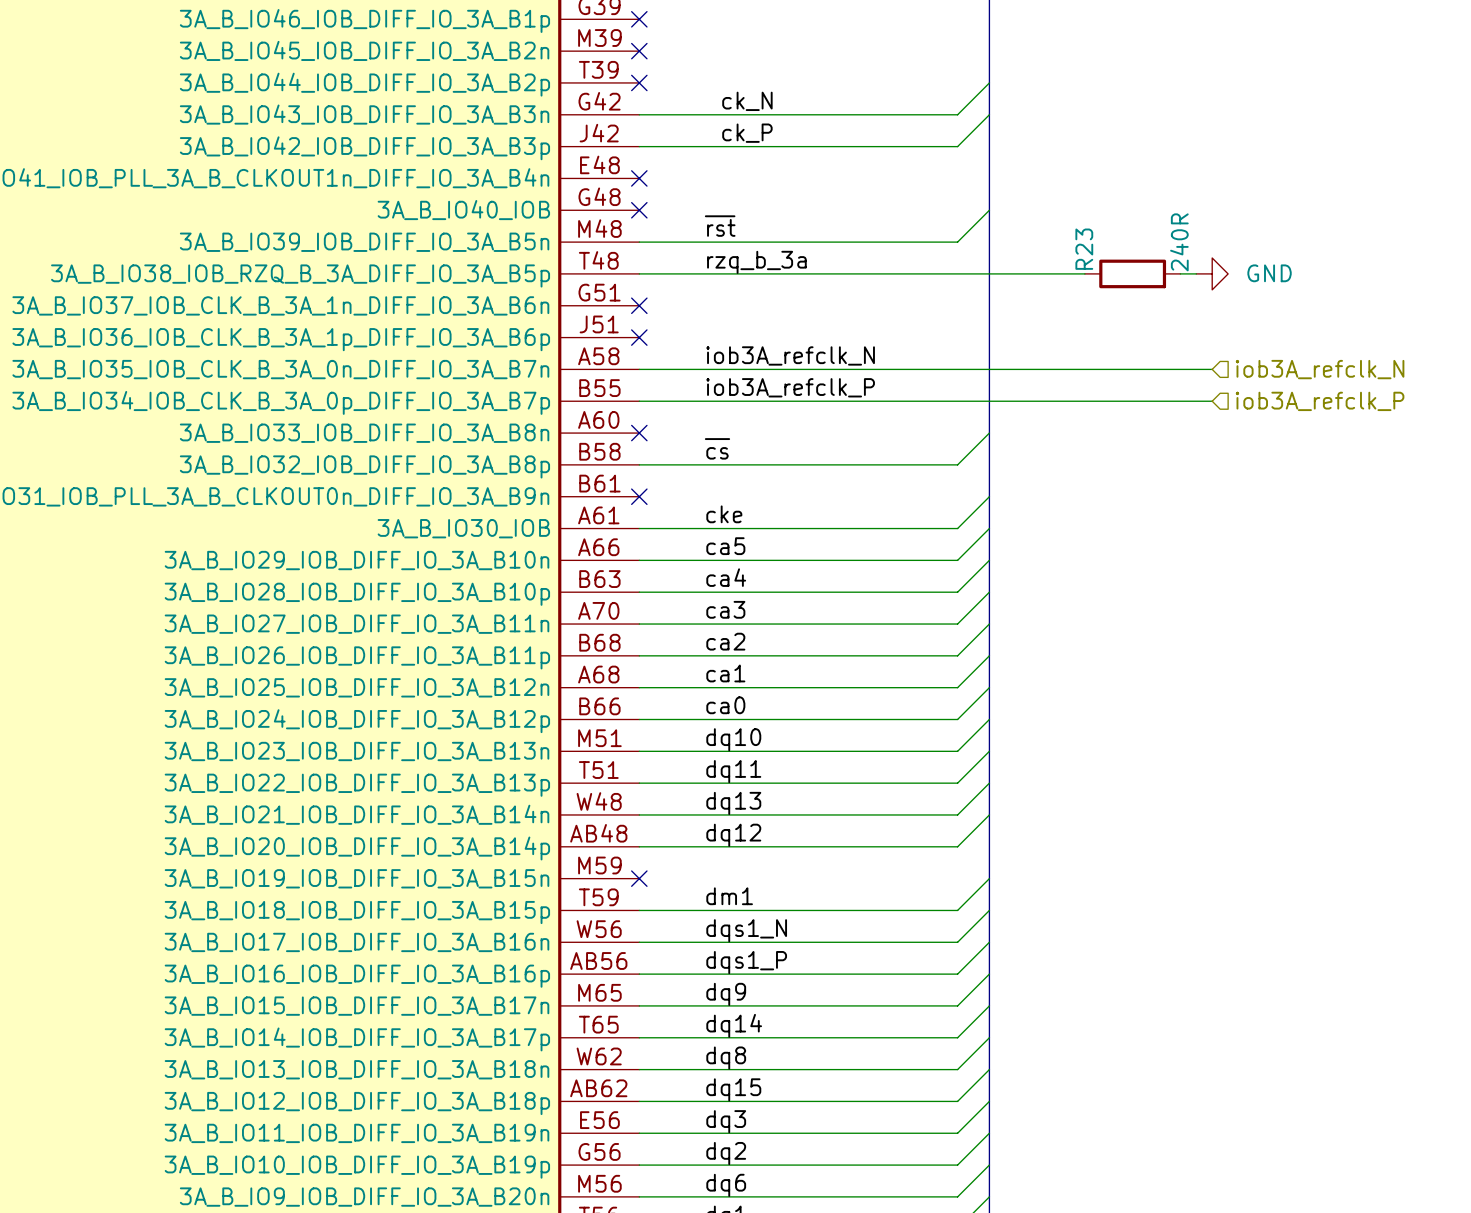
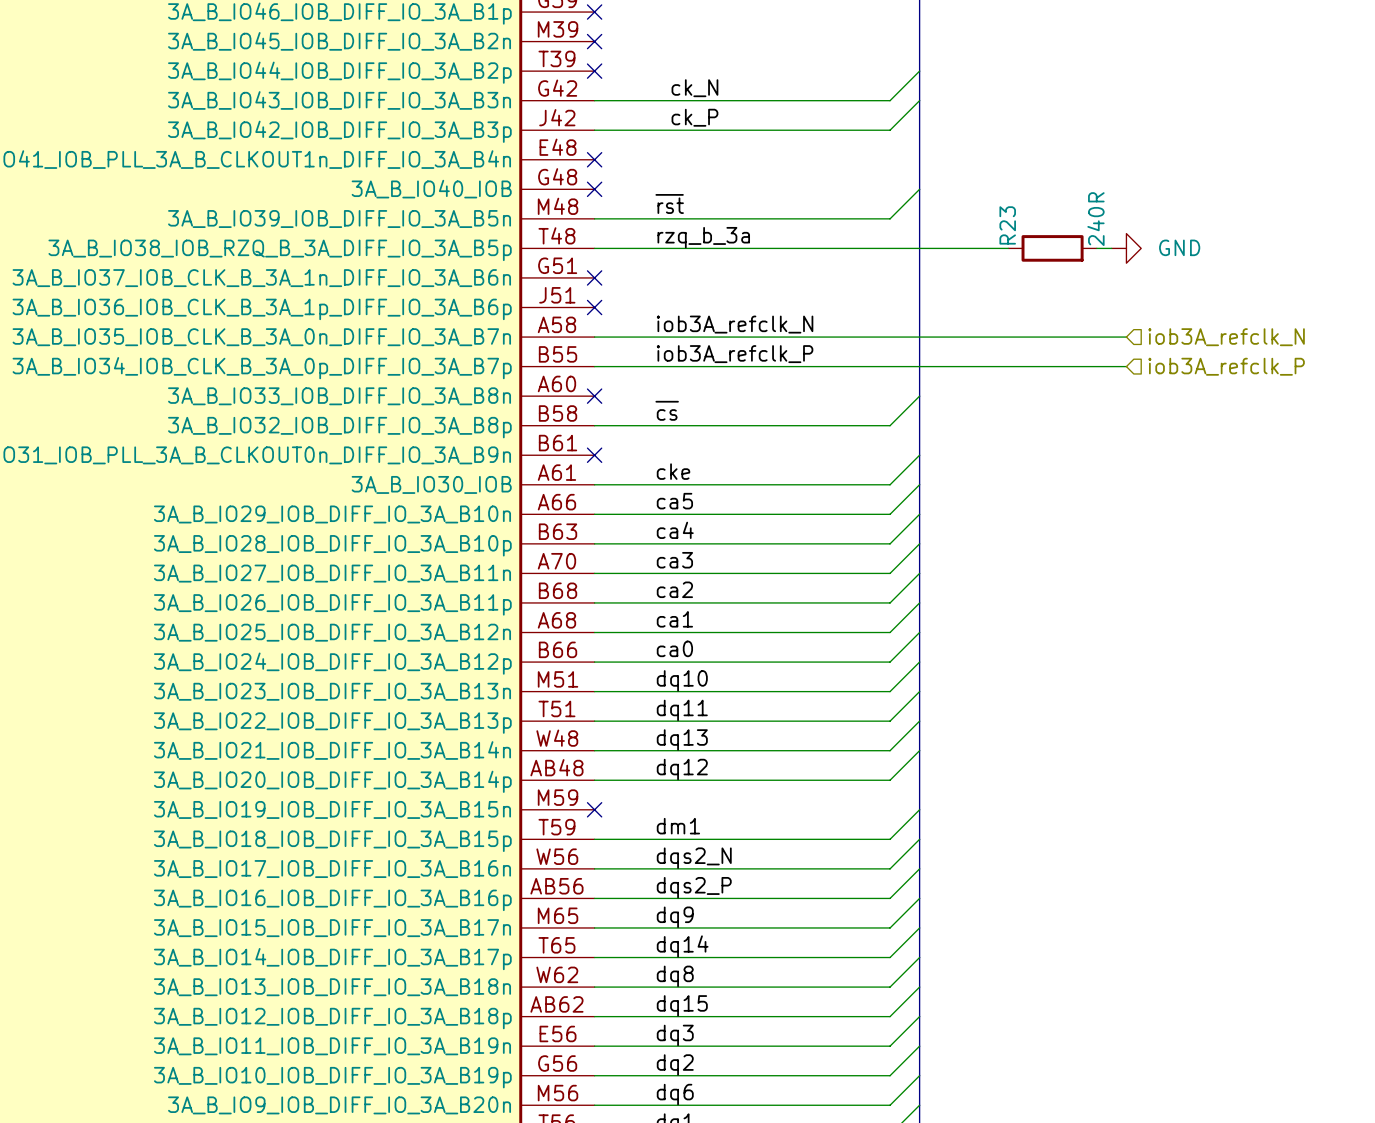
label: dqs1_N (746, 930) -> dqs2_N (694, 858)
label: dqs1_P (746, 962) -> dqs2_P (694, 887)

